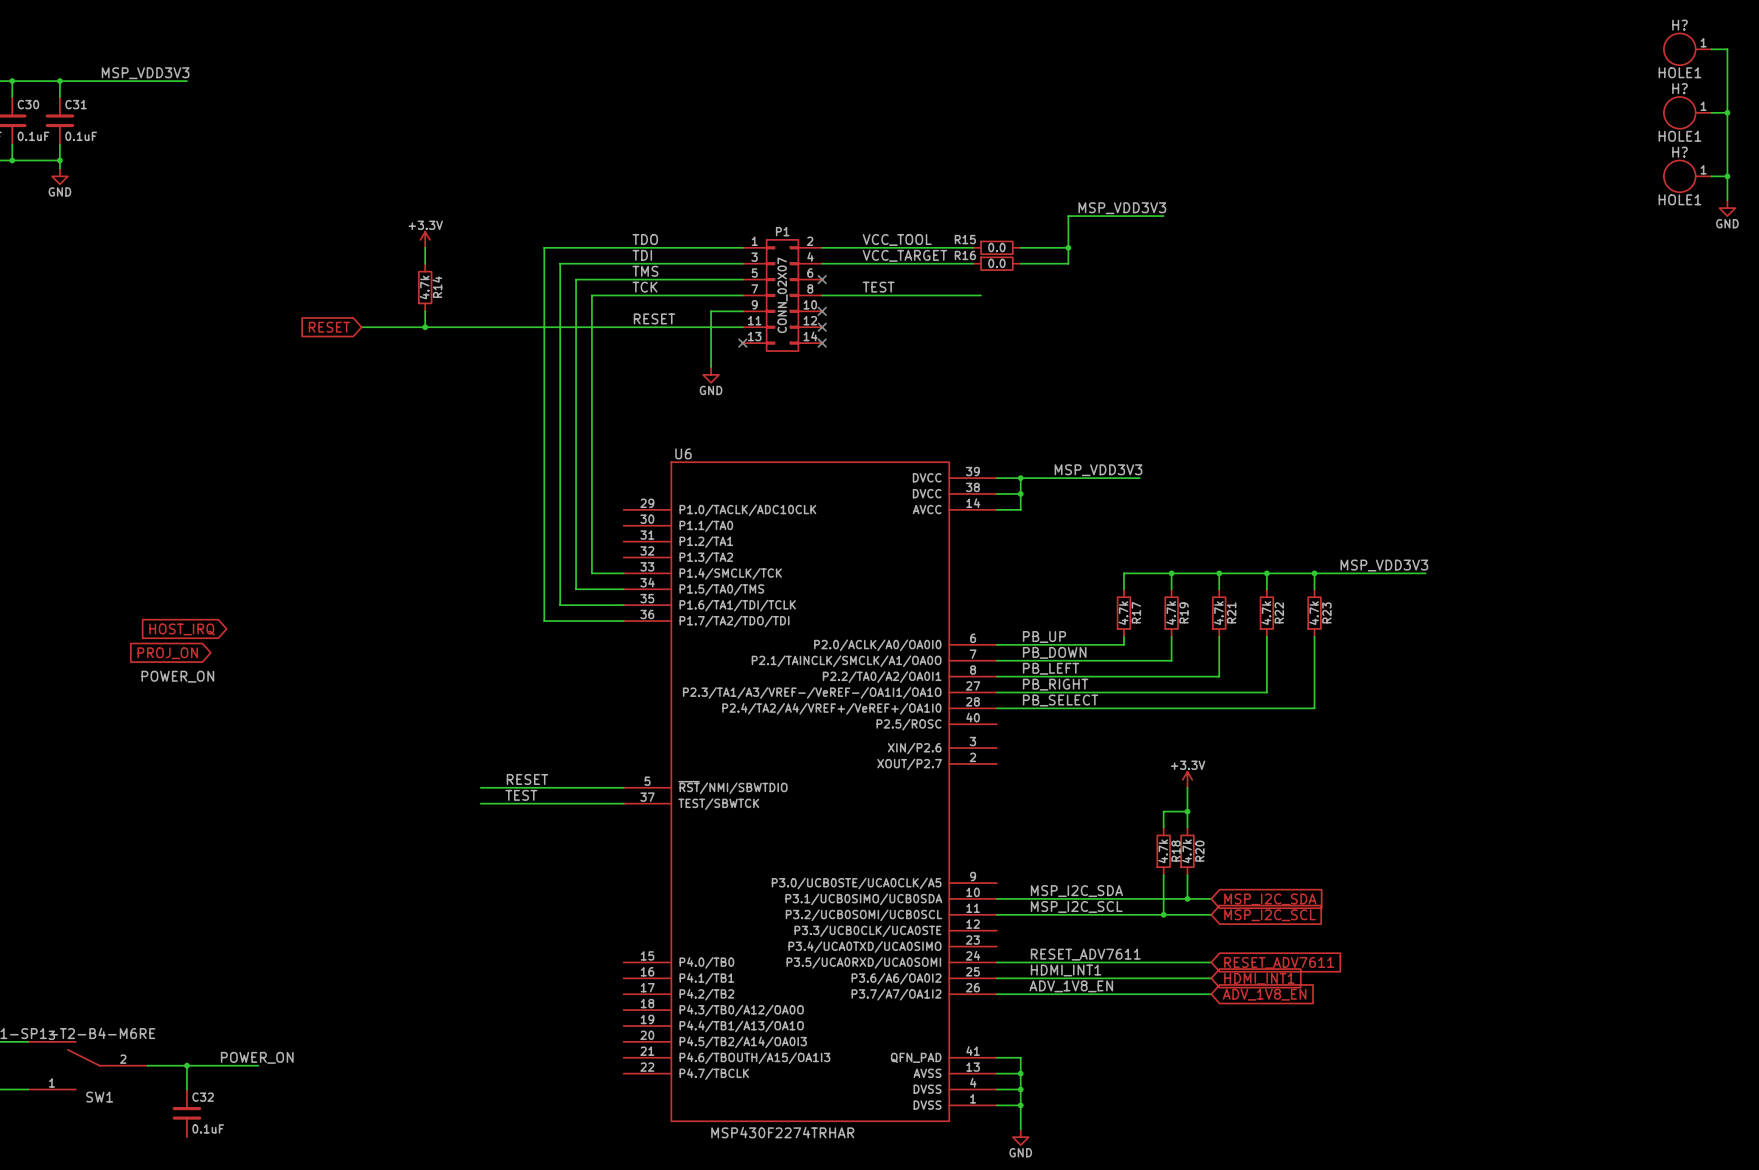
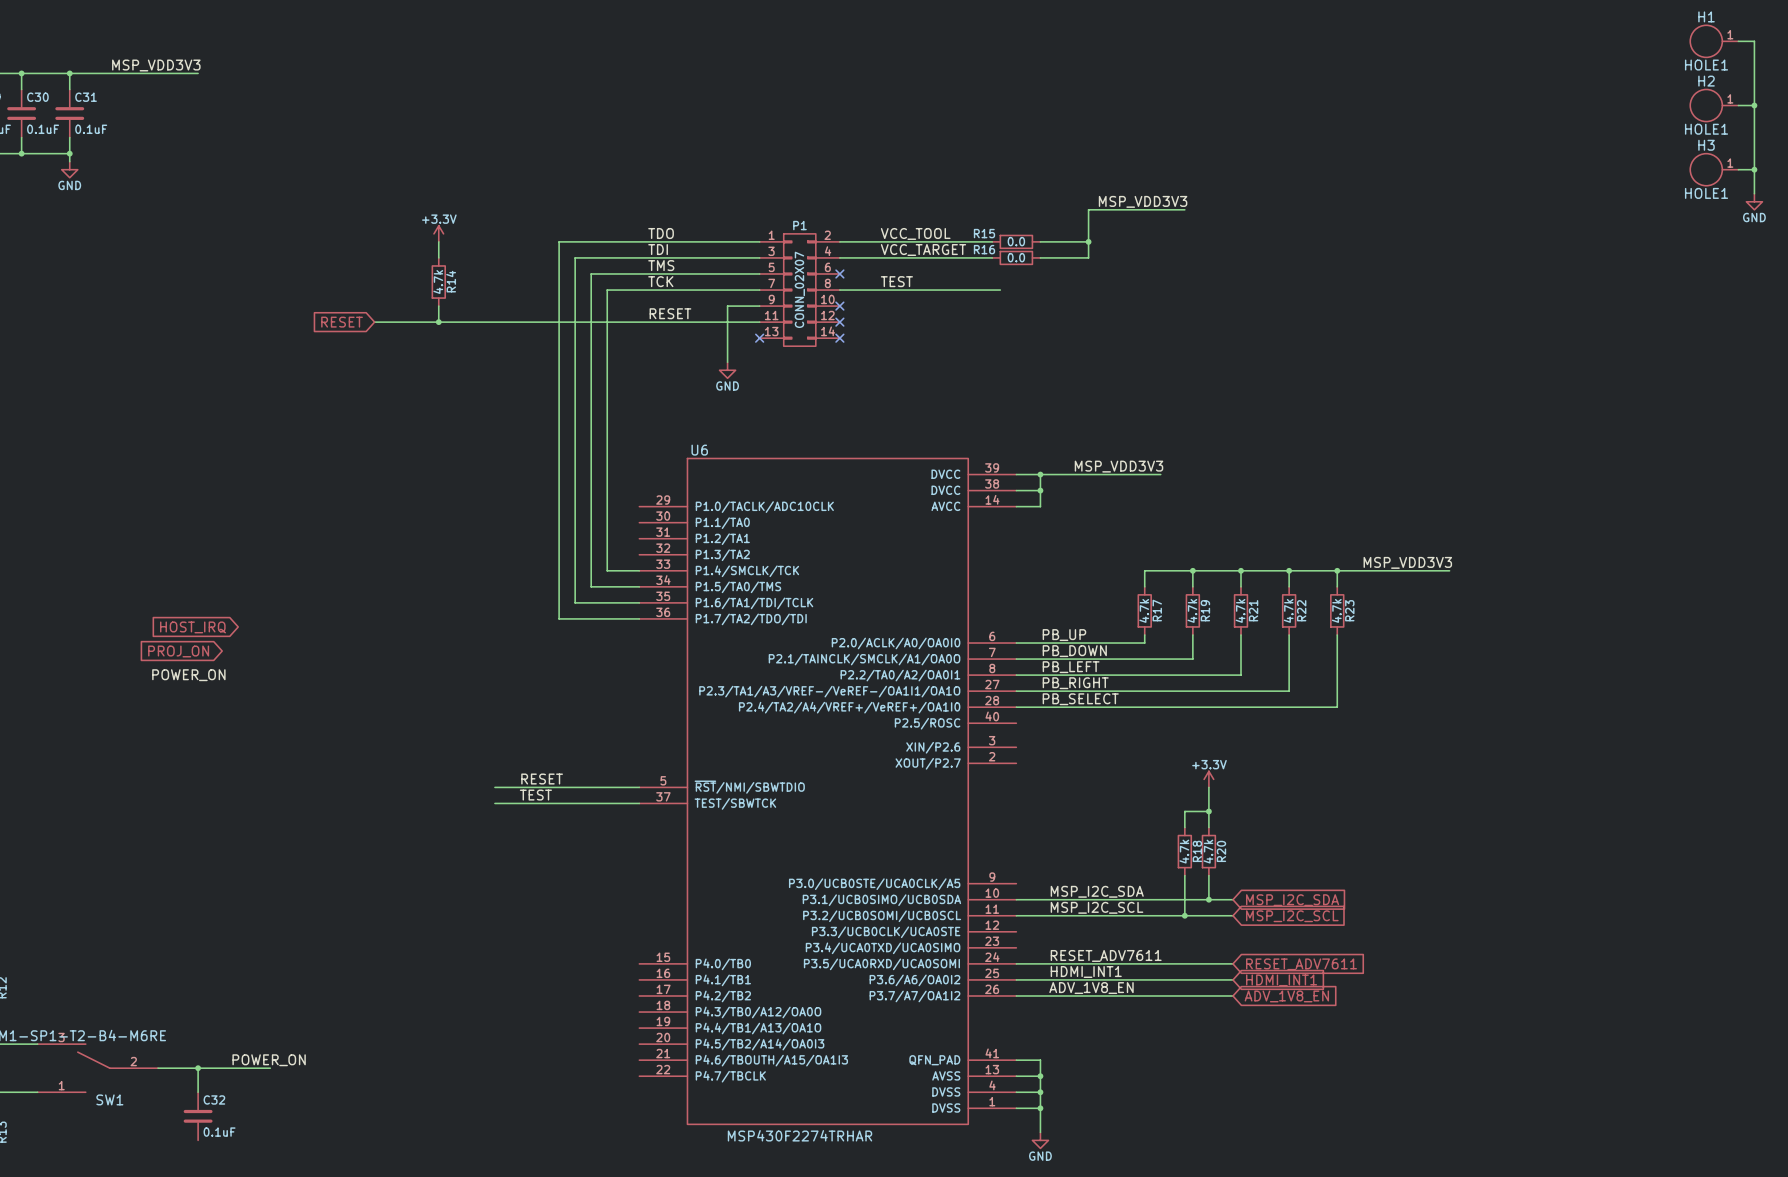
H? name: H? (1680, 25) -> H1 (1706, 16)
H? name: H? (1680, 88) -> H2 (1706, 81)
H? name: H? (1680, 152) -> H3 (1706, 145)

